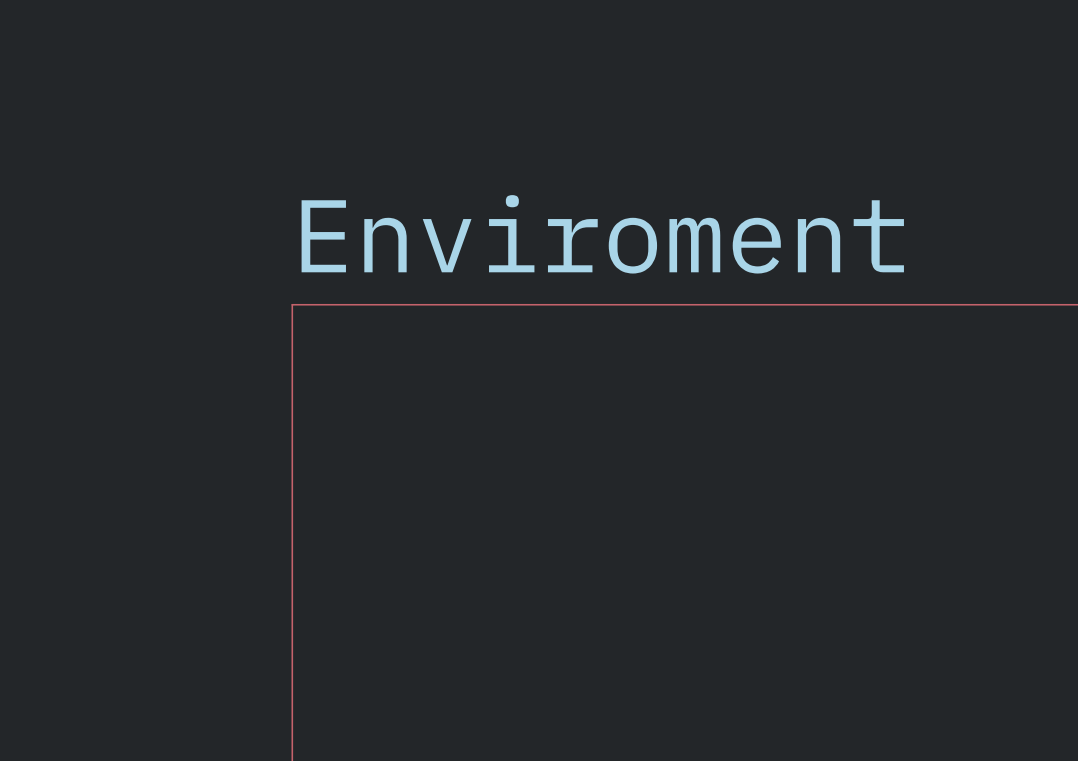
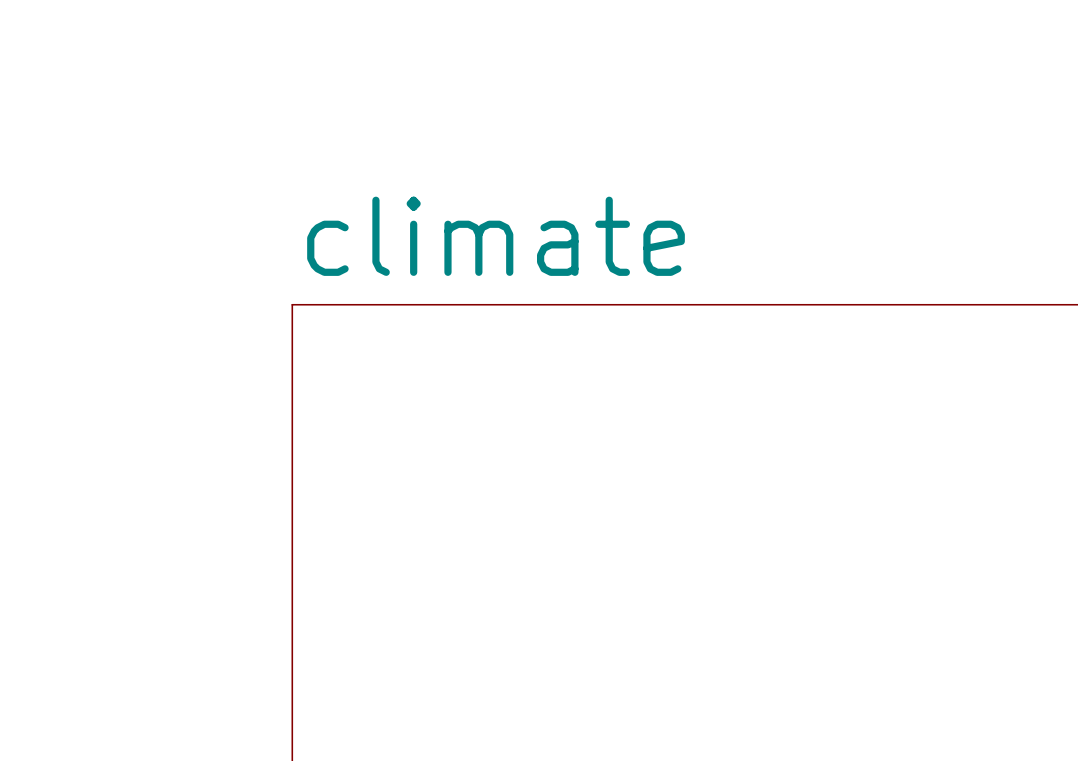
sheet Enviroment name: Enviroment (602, 234) -> climate (496, 236)

